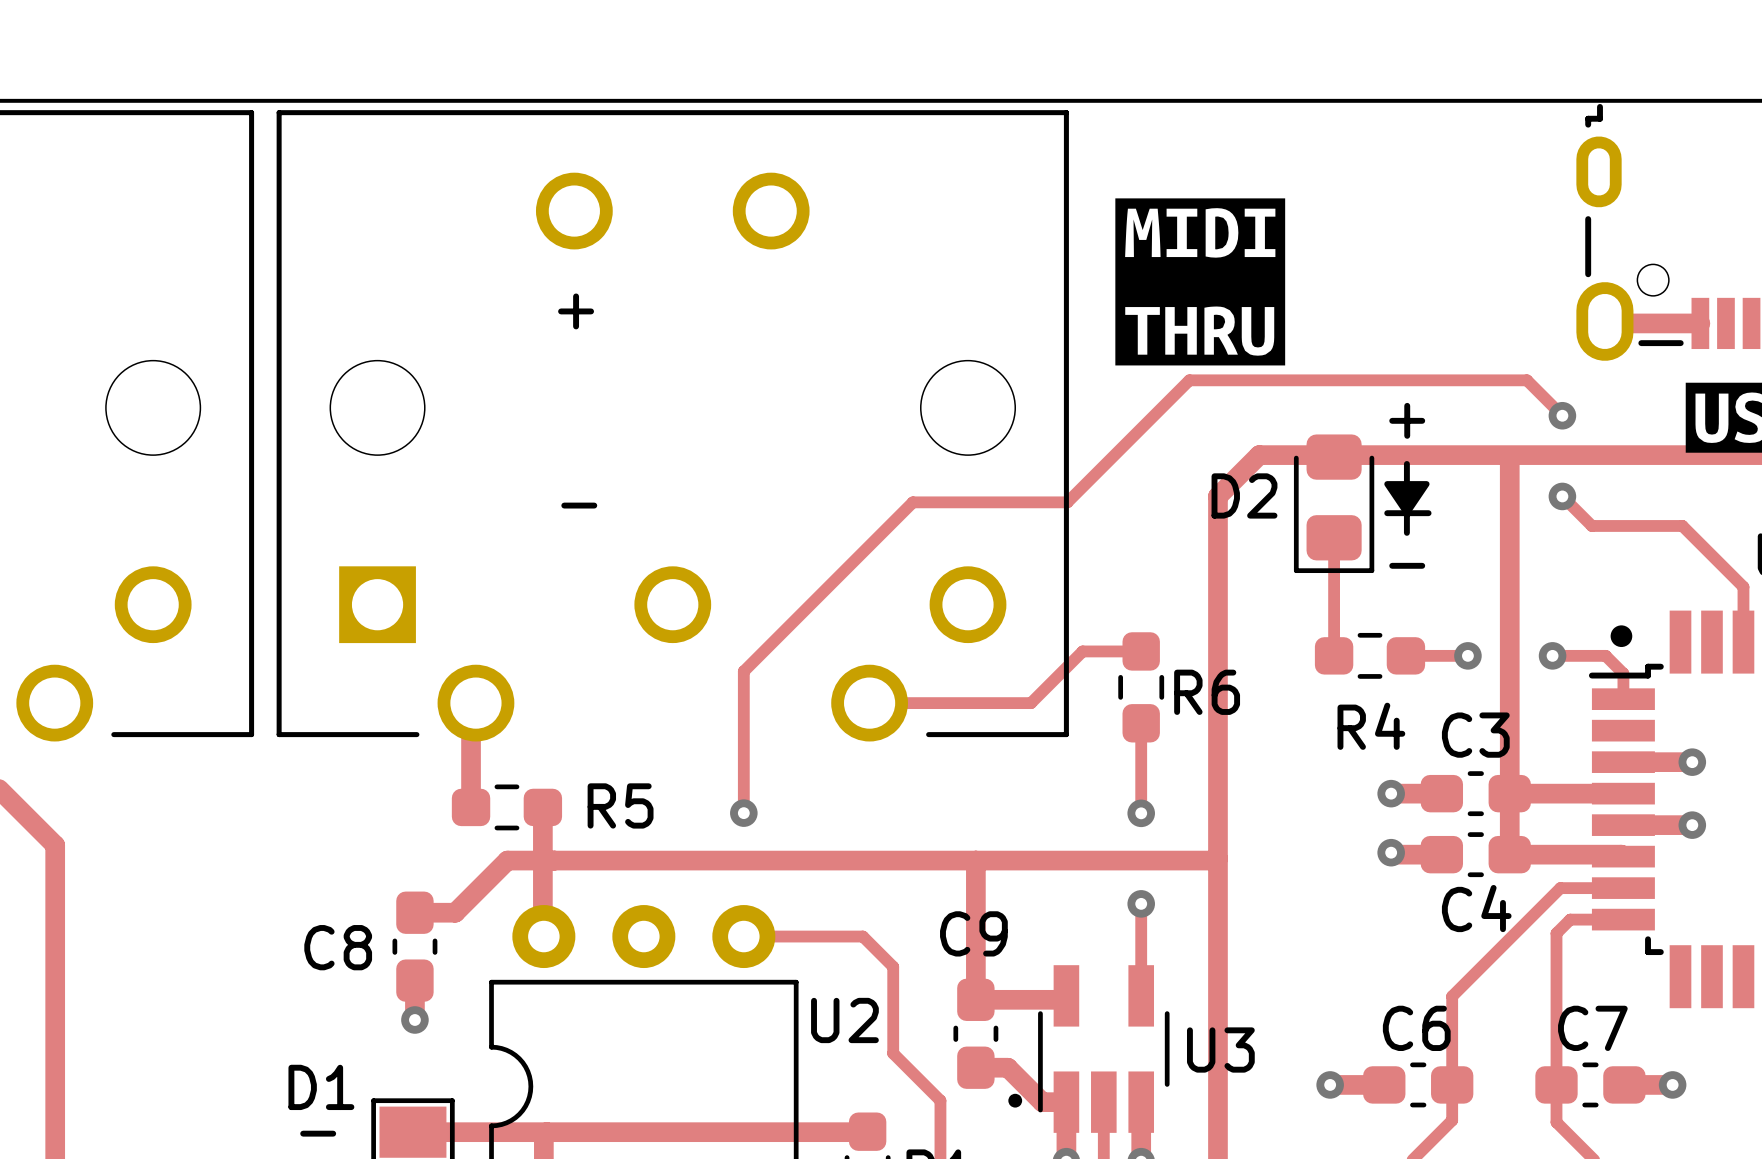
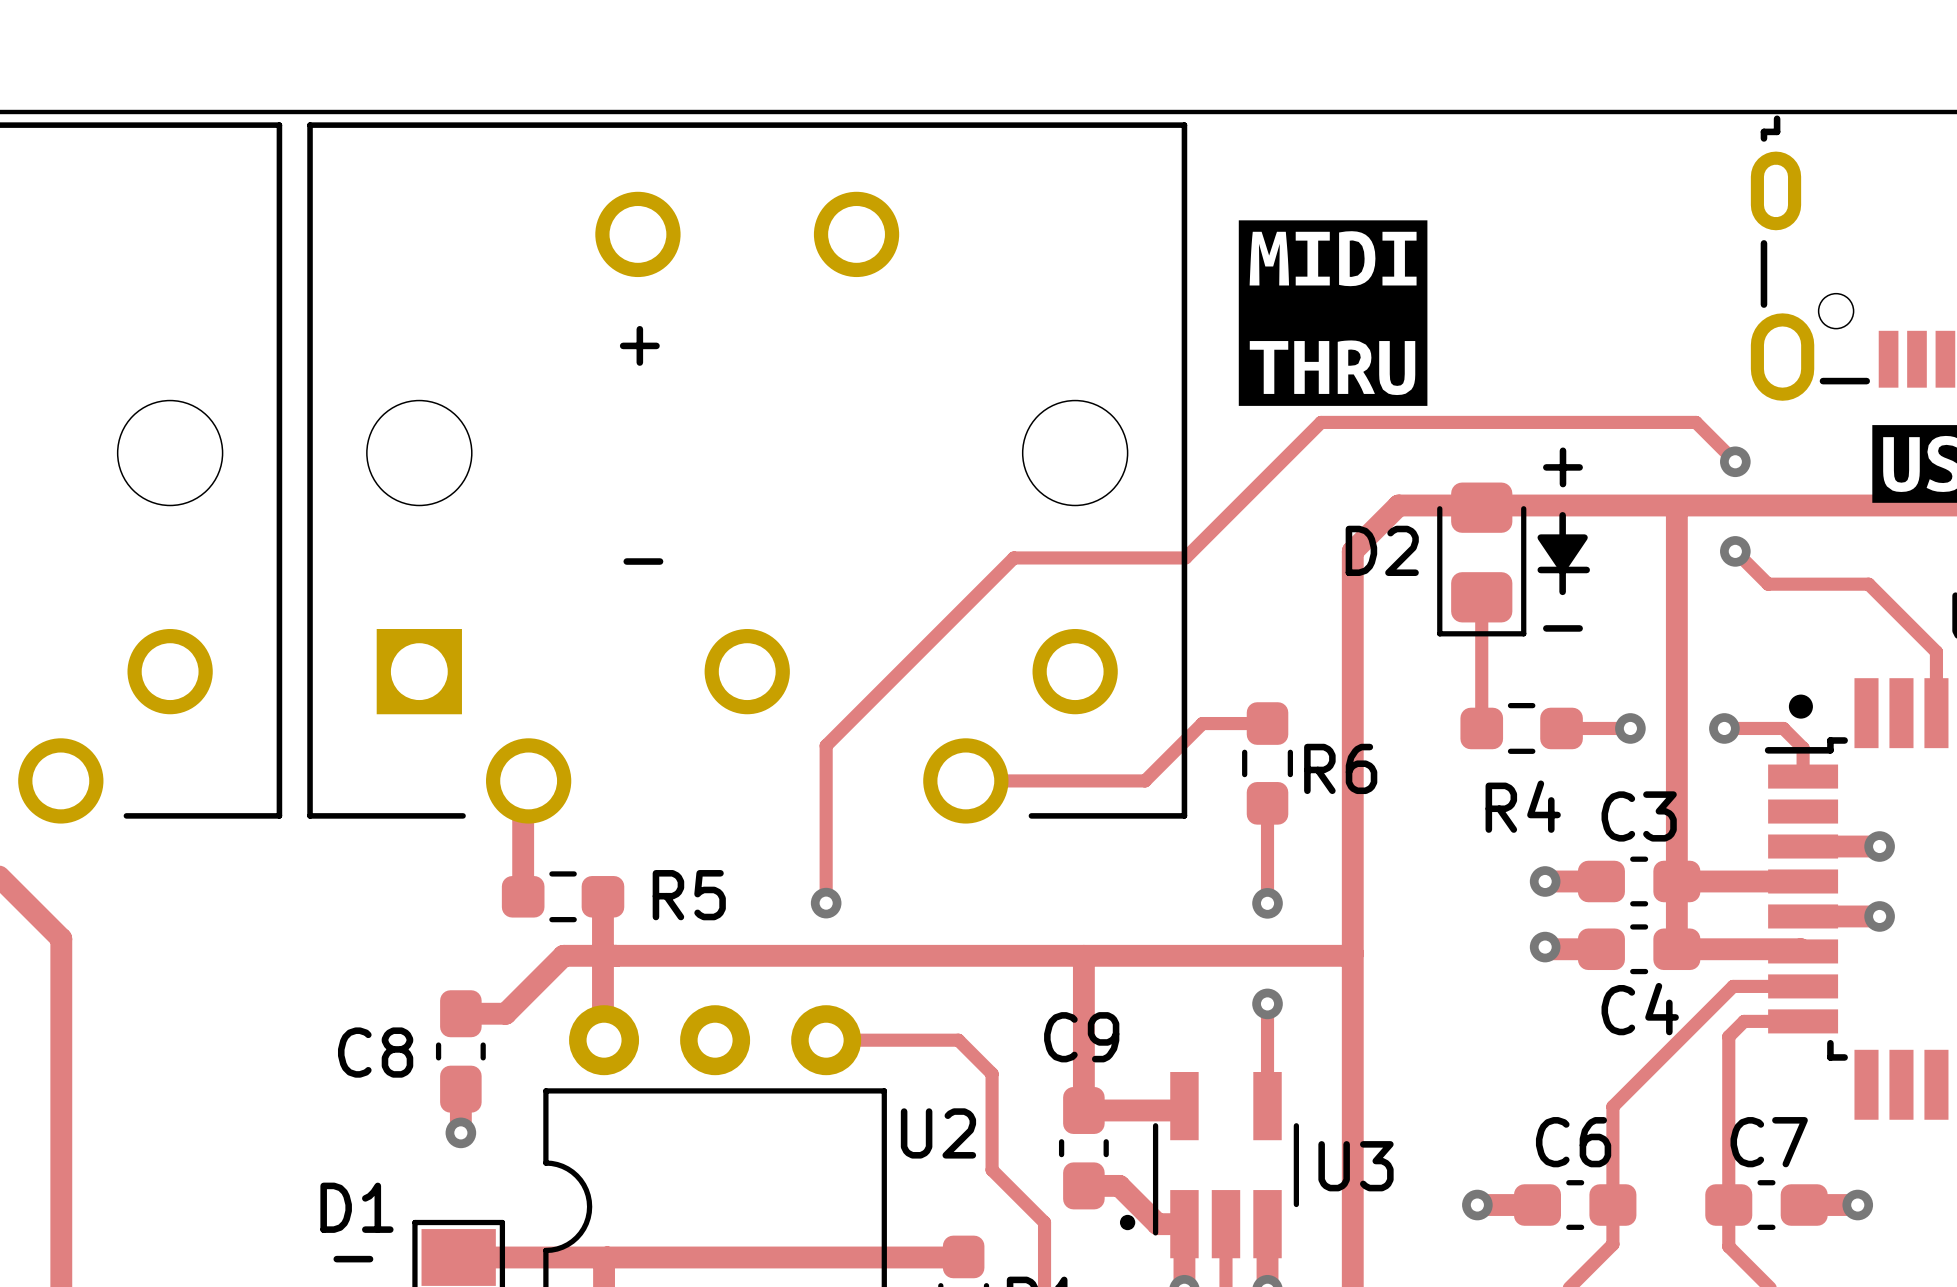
track: (1604, 321) (1606, 323) (1700, 323) -> none

